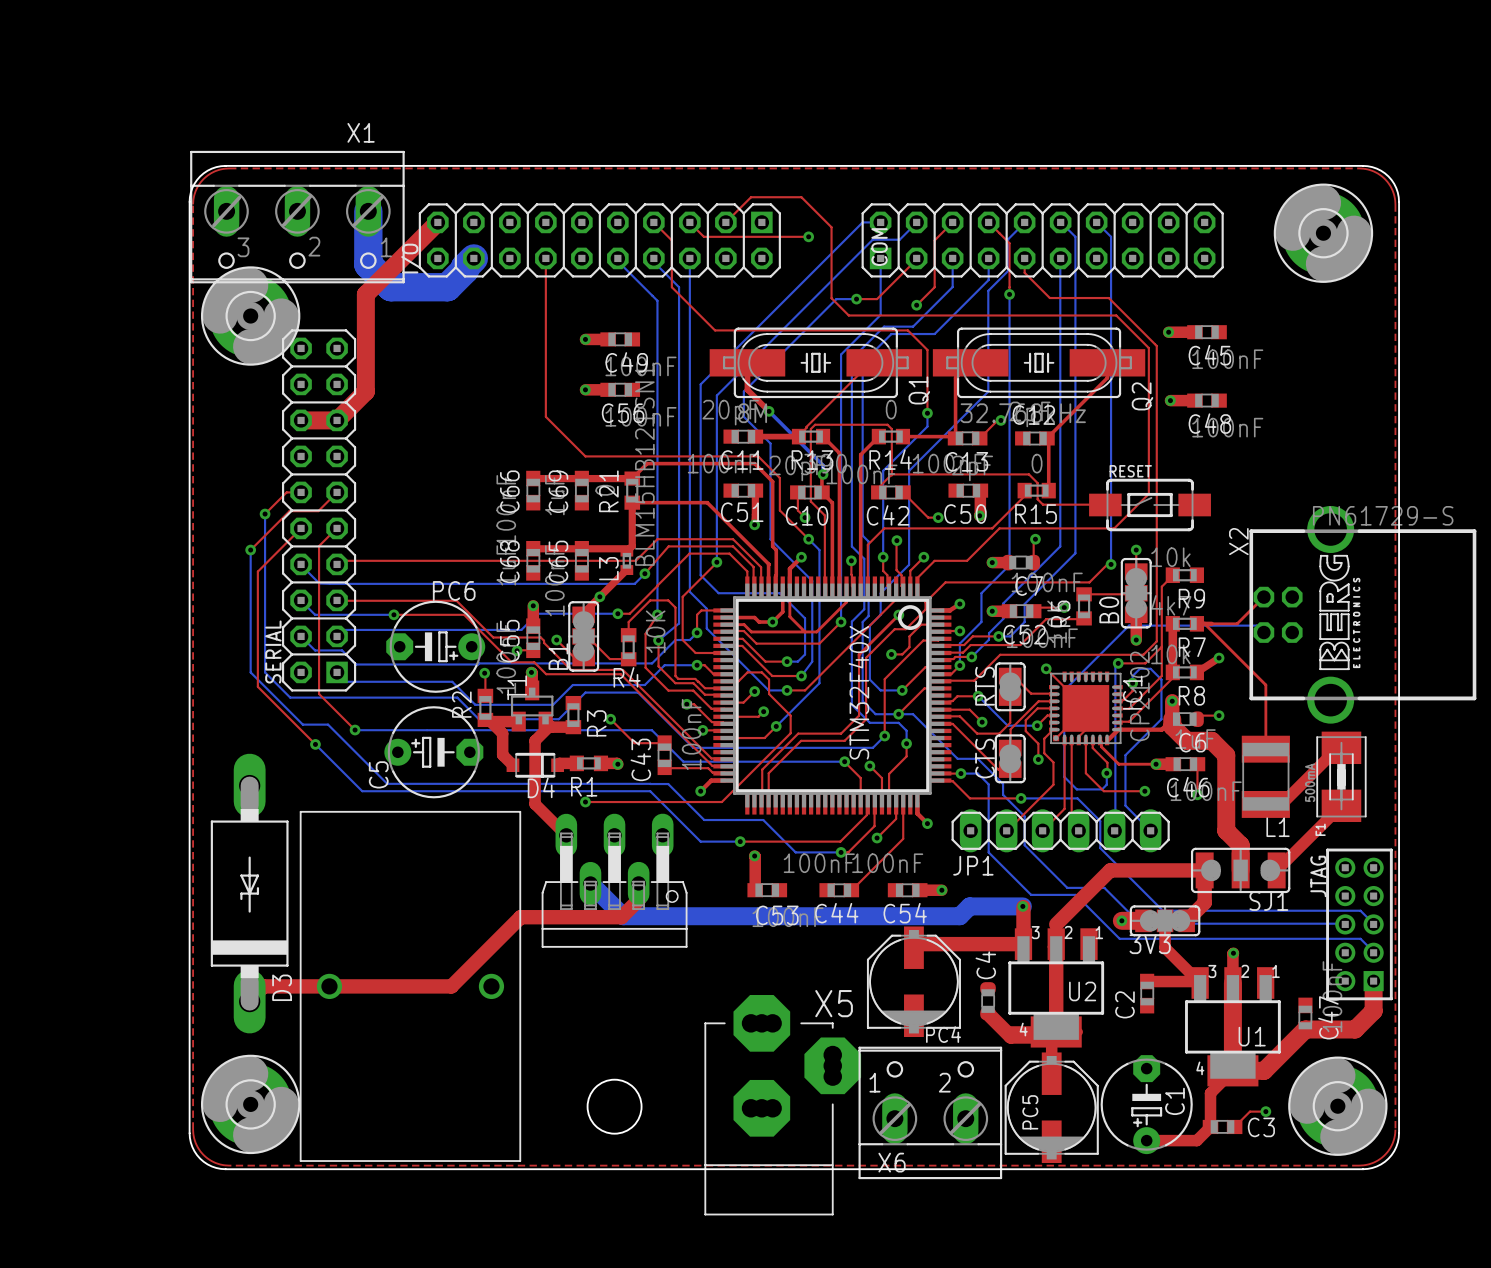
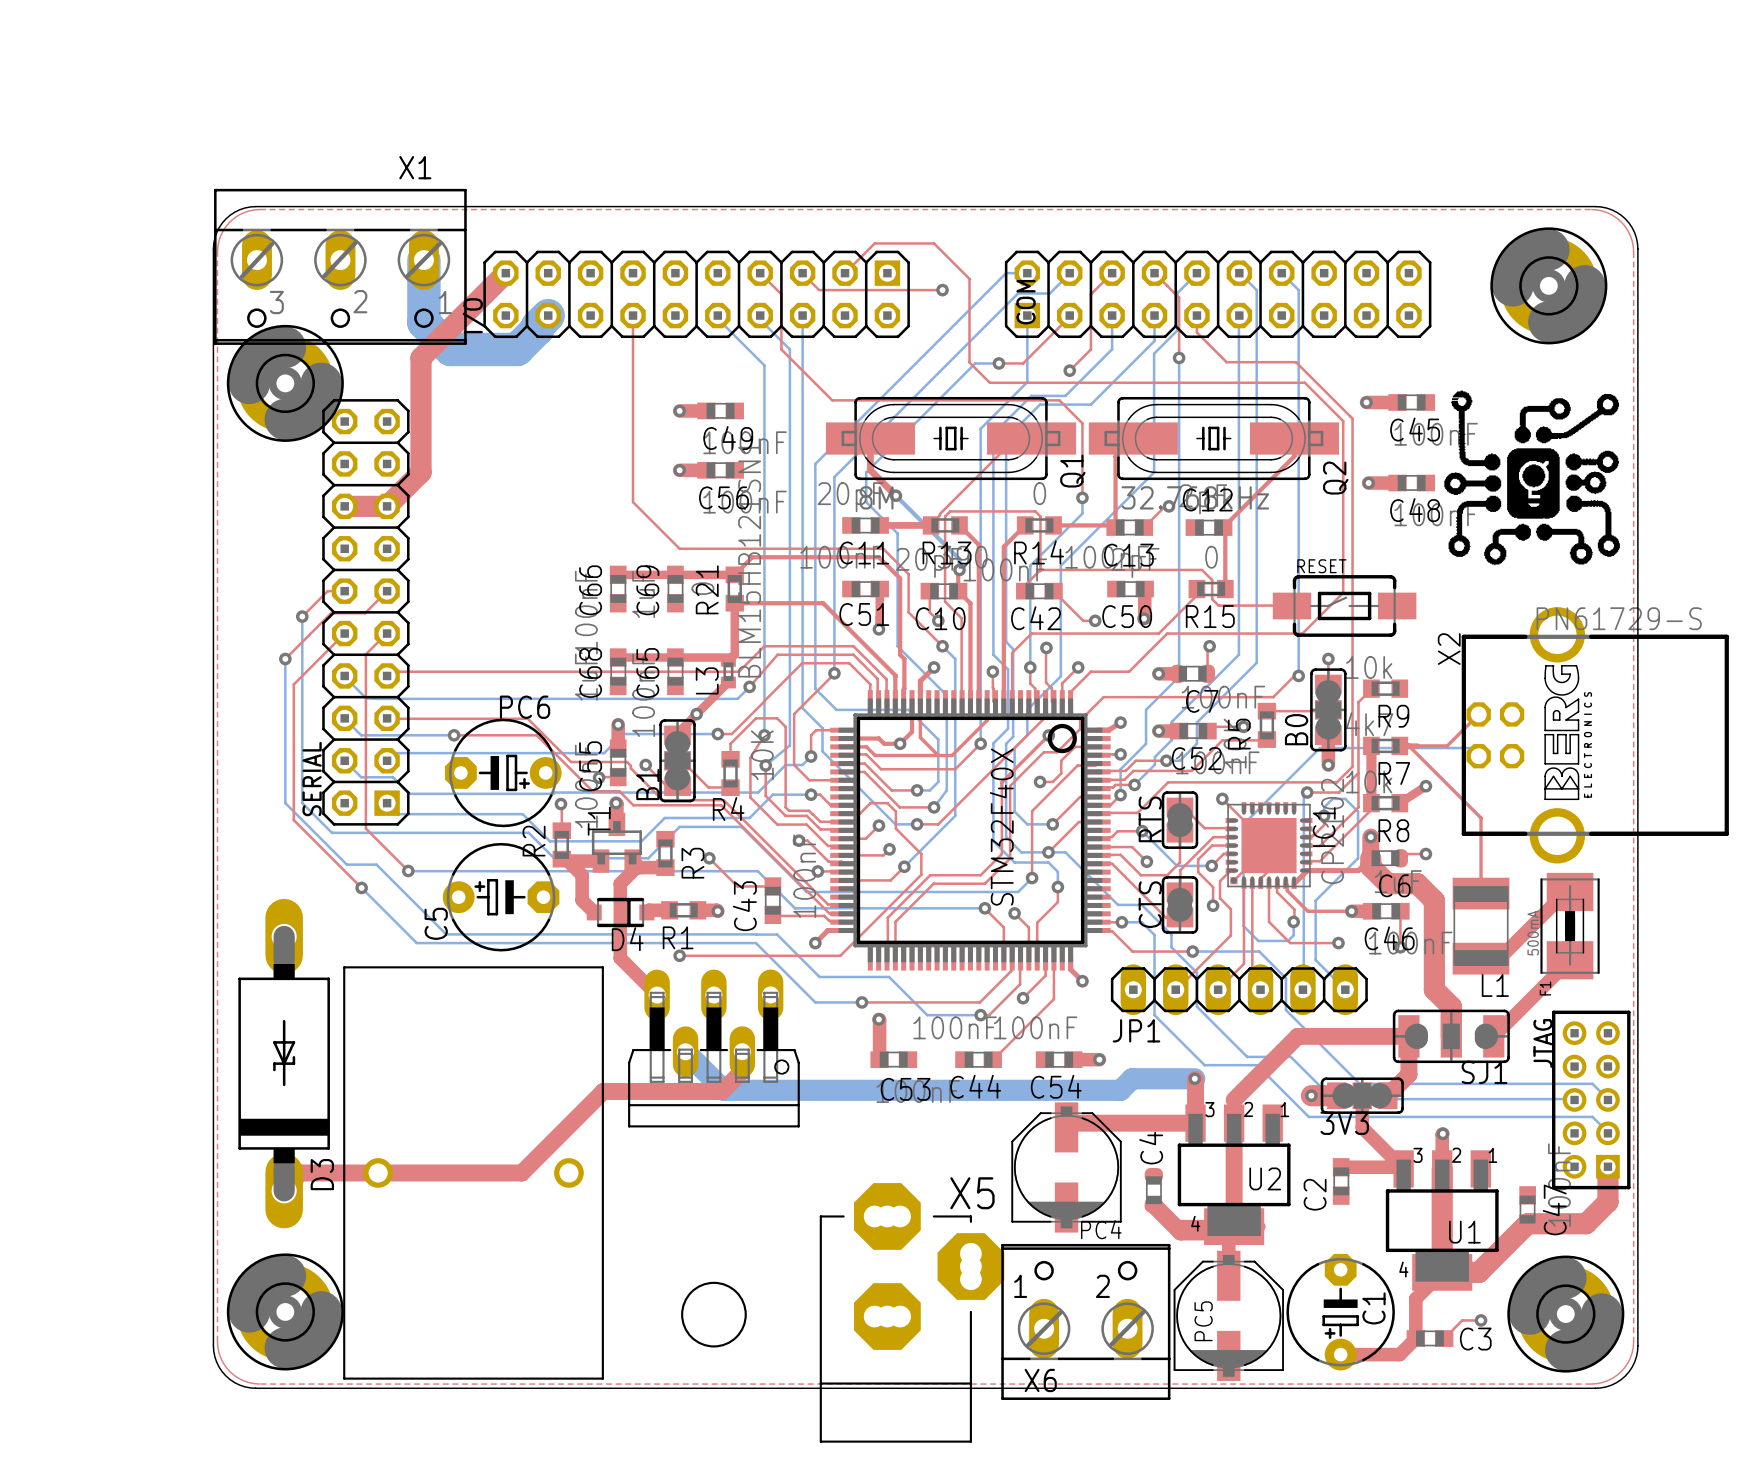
drawing: none -> [1444, 390, 1620, 566]

